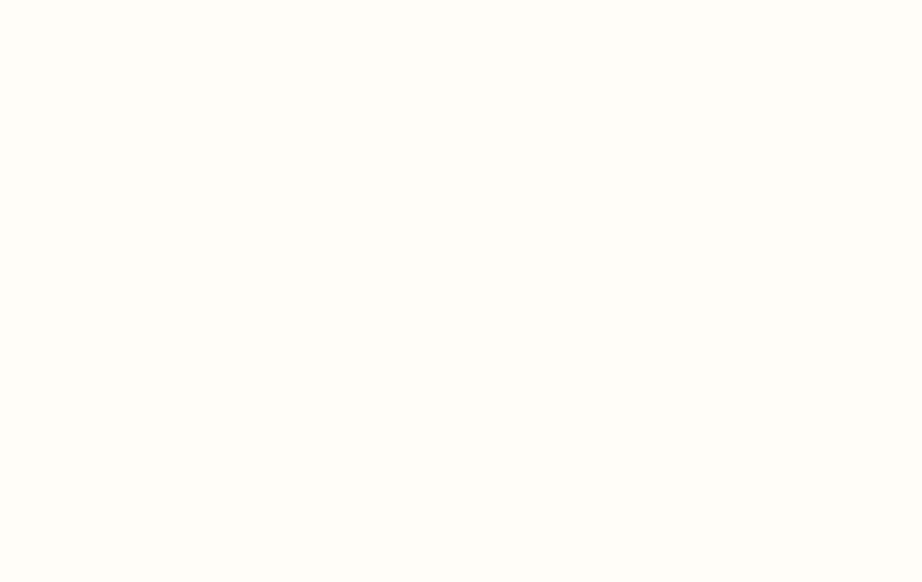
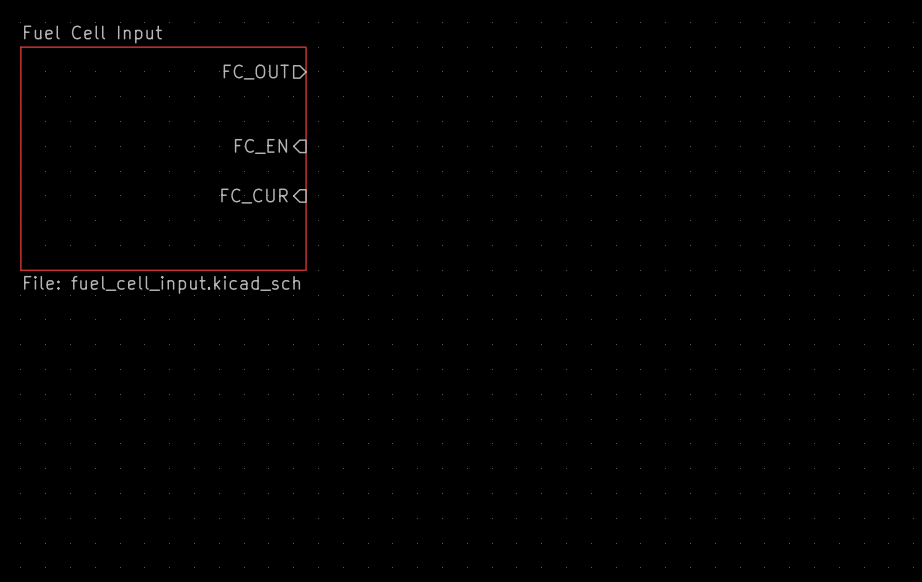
sheet pin: none -> FC_OUT (256, 72)
sheet pin: none -> FC_EN (260, 146)
sheet Fuel Cell Input: none -> File: fuel_cell_input.kicad_sch (163, 158)
sheet pin: none -> FC_CUR (254, 196)

